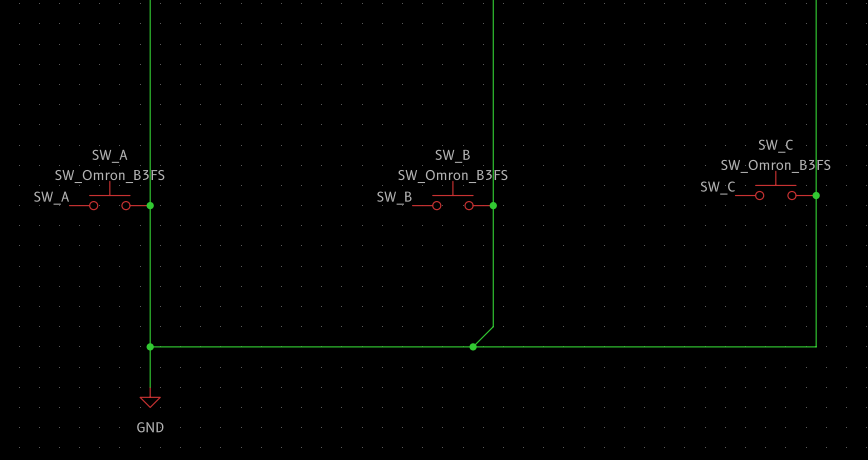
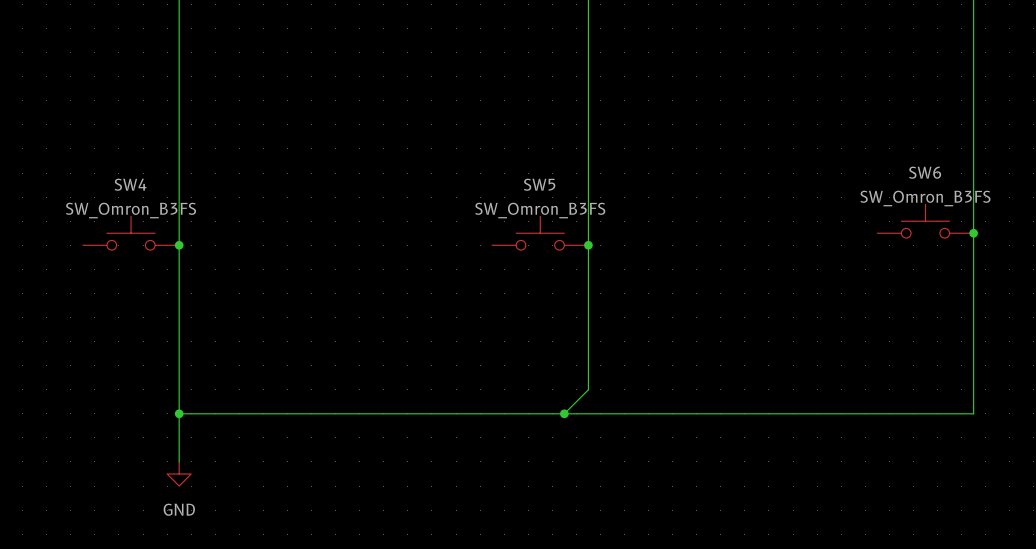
SW_C name: SW_C (775, 146) -> SW6 (925, 172)
SW_A name: SW_A (109, 156) -> SW4 (130, 184)
SW_B name: SW_B (452, 156) -> SW5 (539, 184)
label: SW_C (717, 188) -> none
label: SW_A (51, 198) -> none
label: SW_B (394, 198) -> none

